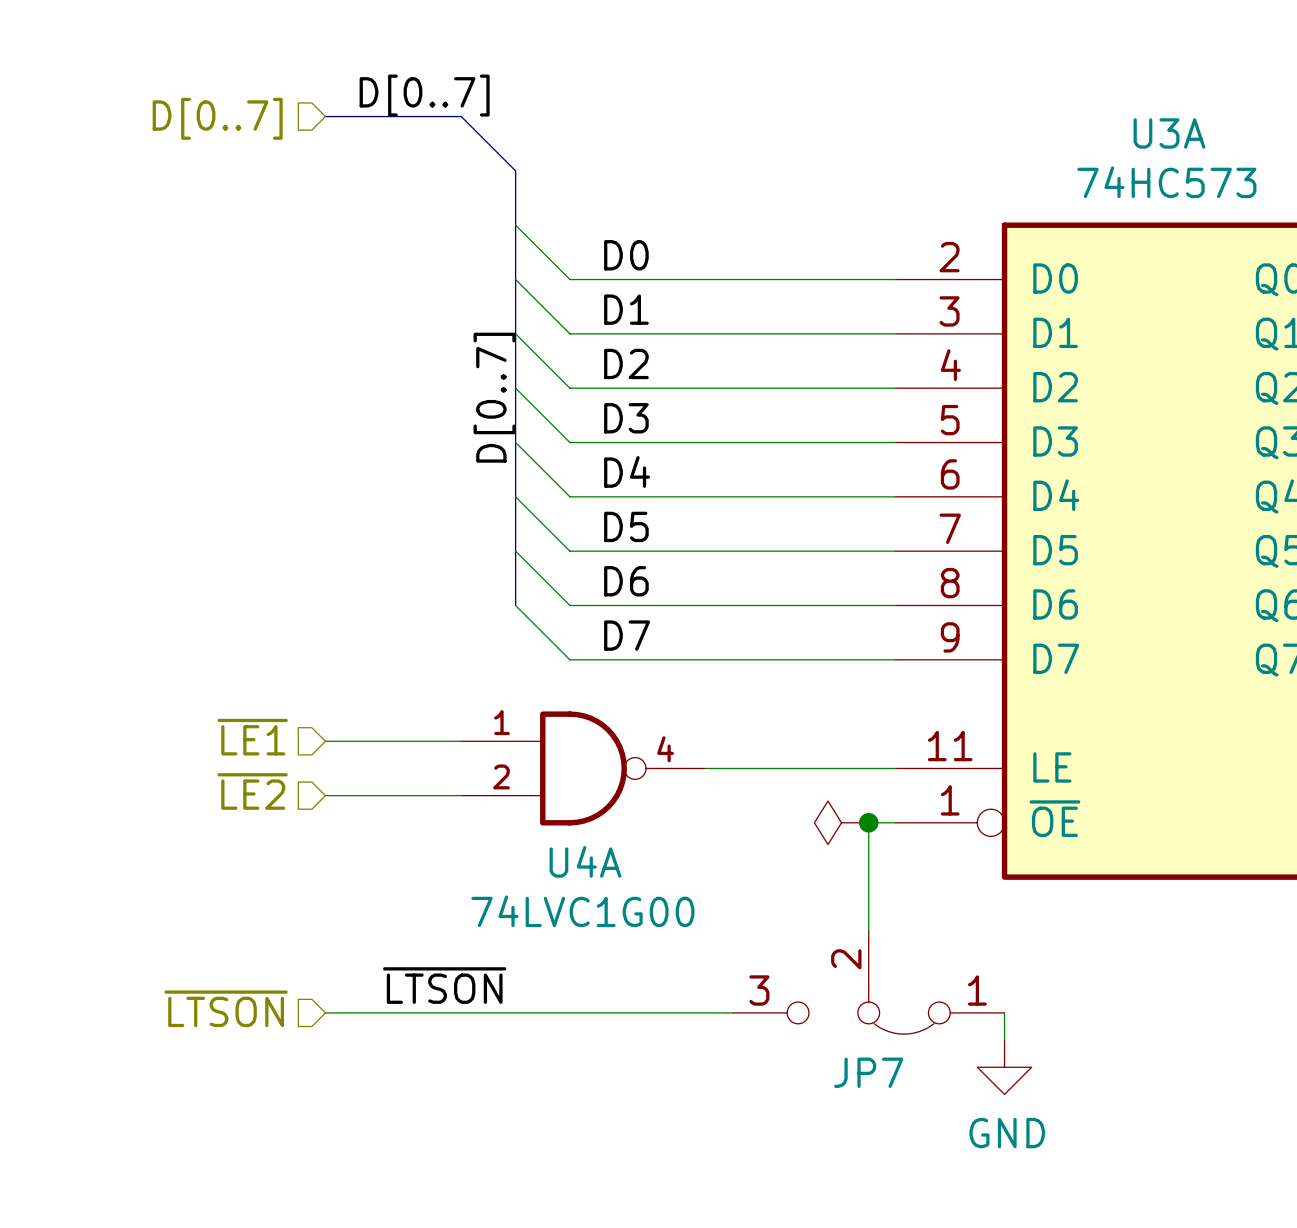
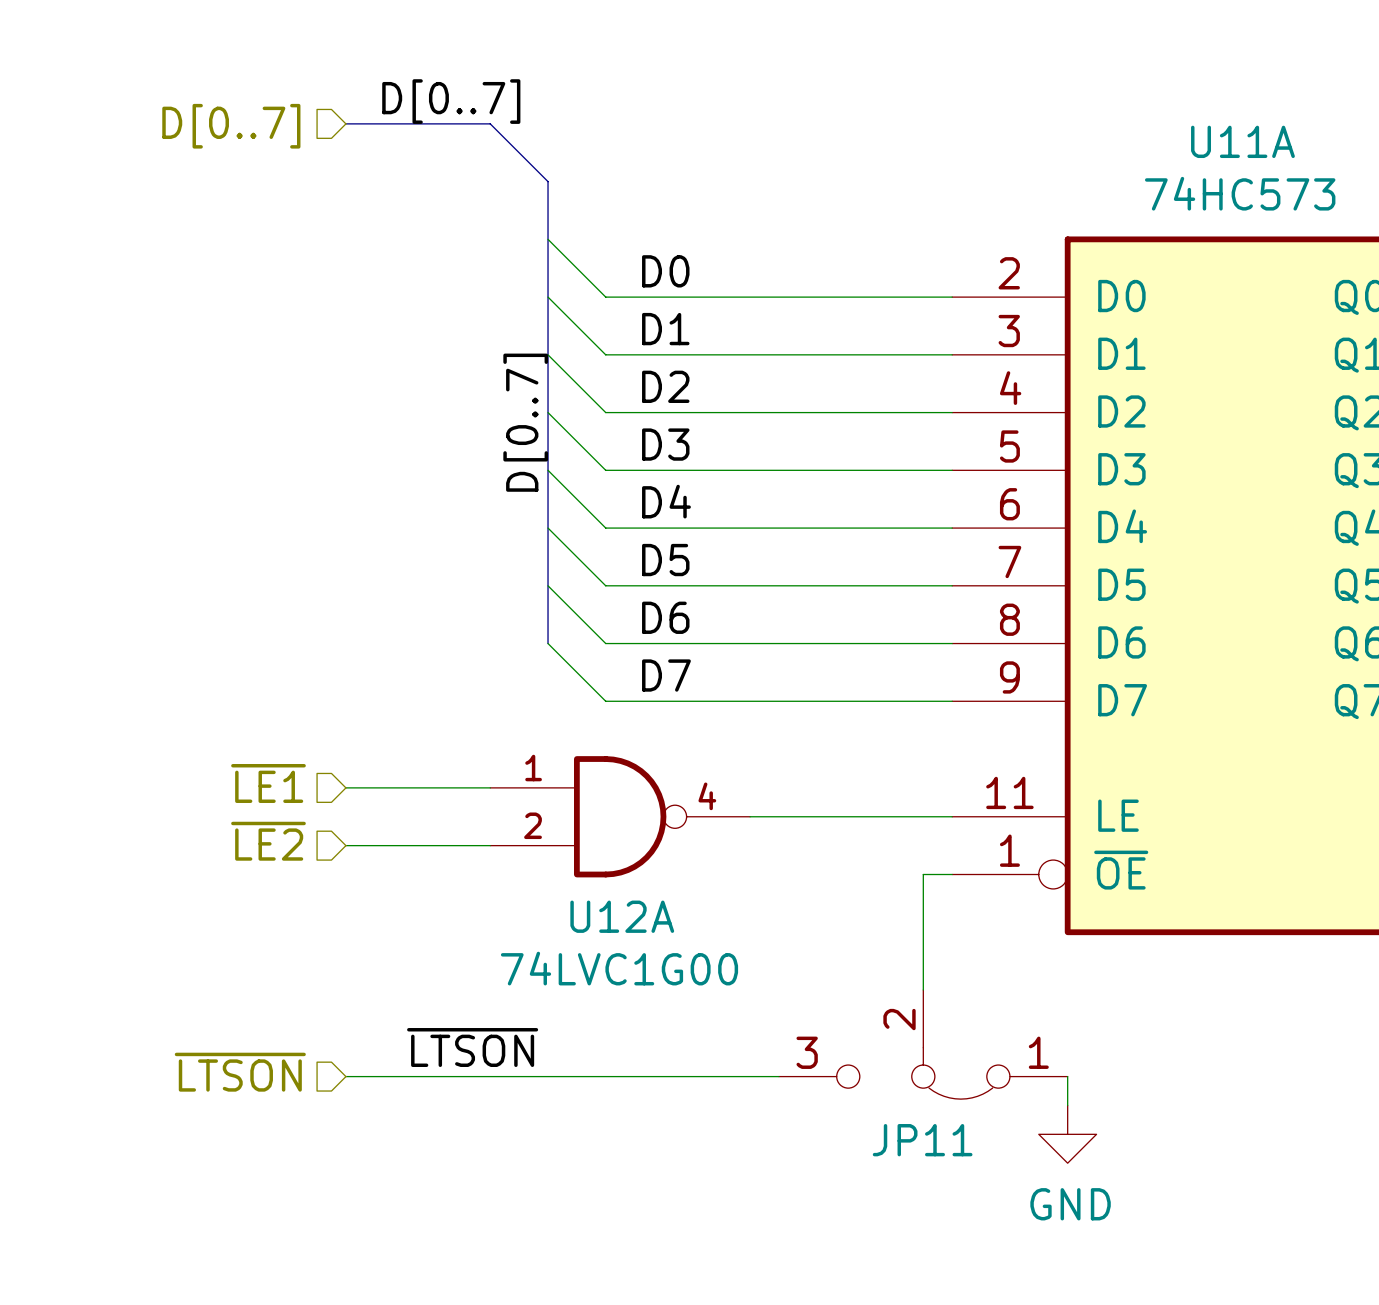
U3A name: U3A (1169, 133) -> U11A (1242, 141)
power symbol: (841, 822) -> none
junction: (868, 822) -> none
U4A name: U4A (585, 861) -> U12A (622, 916)
JP7 name: JP7 (868, 1072) -> JP11 (922, 1140)

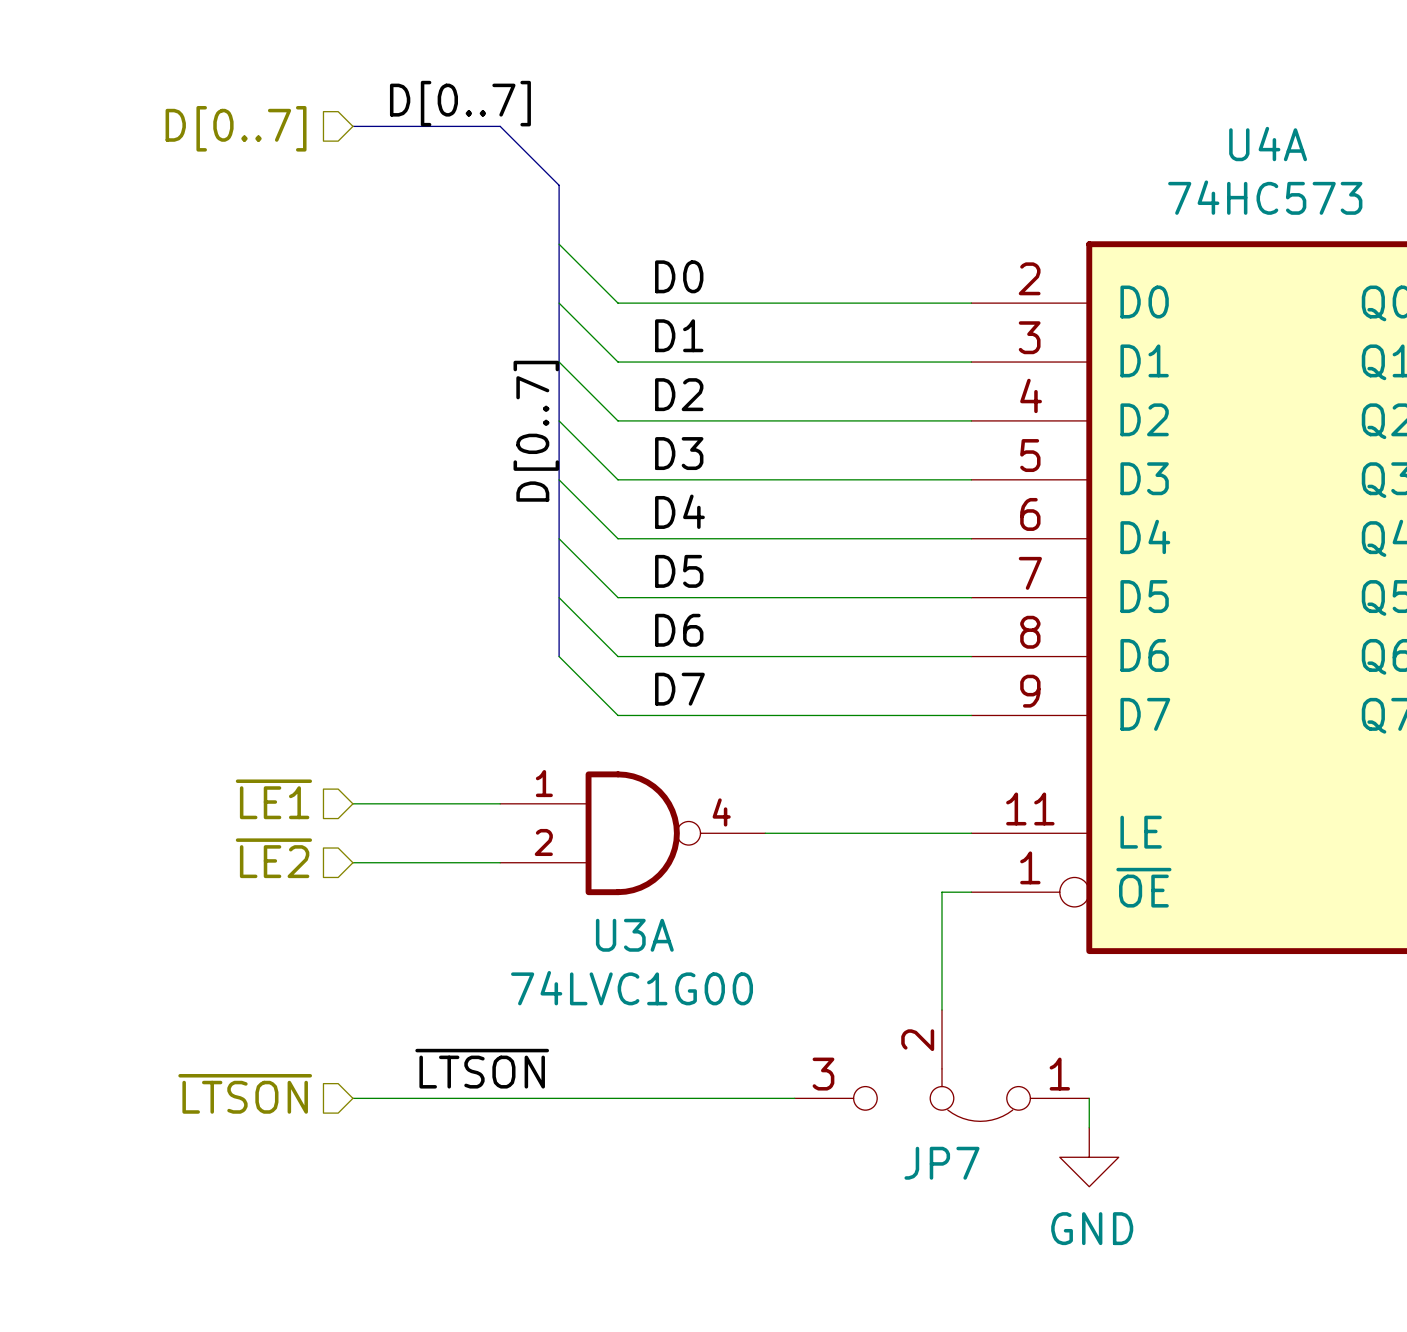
U11A name: U11A (1242, 141) -> U4A (1268, 144)
U12A name: U12A (622, 916) -> U3A (634, 935)
JP11 name: JP11 (922, 1140) -> JP7 (941, 1163)

